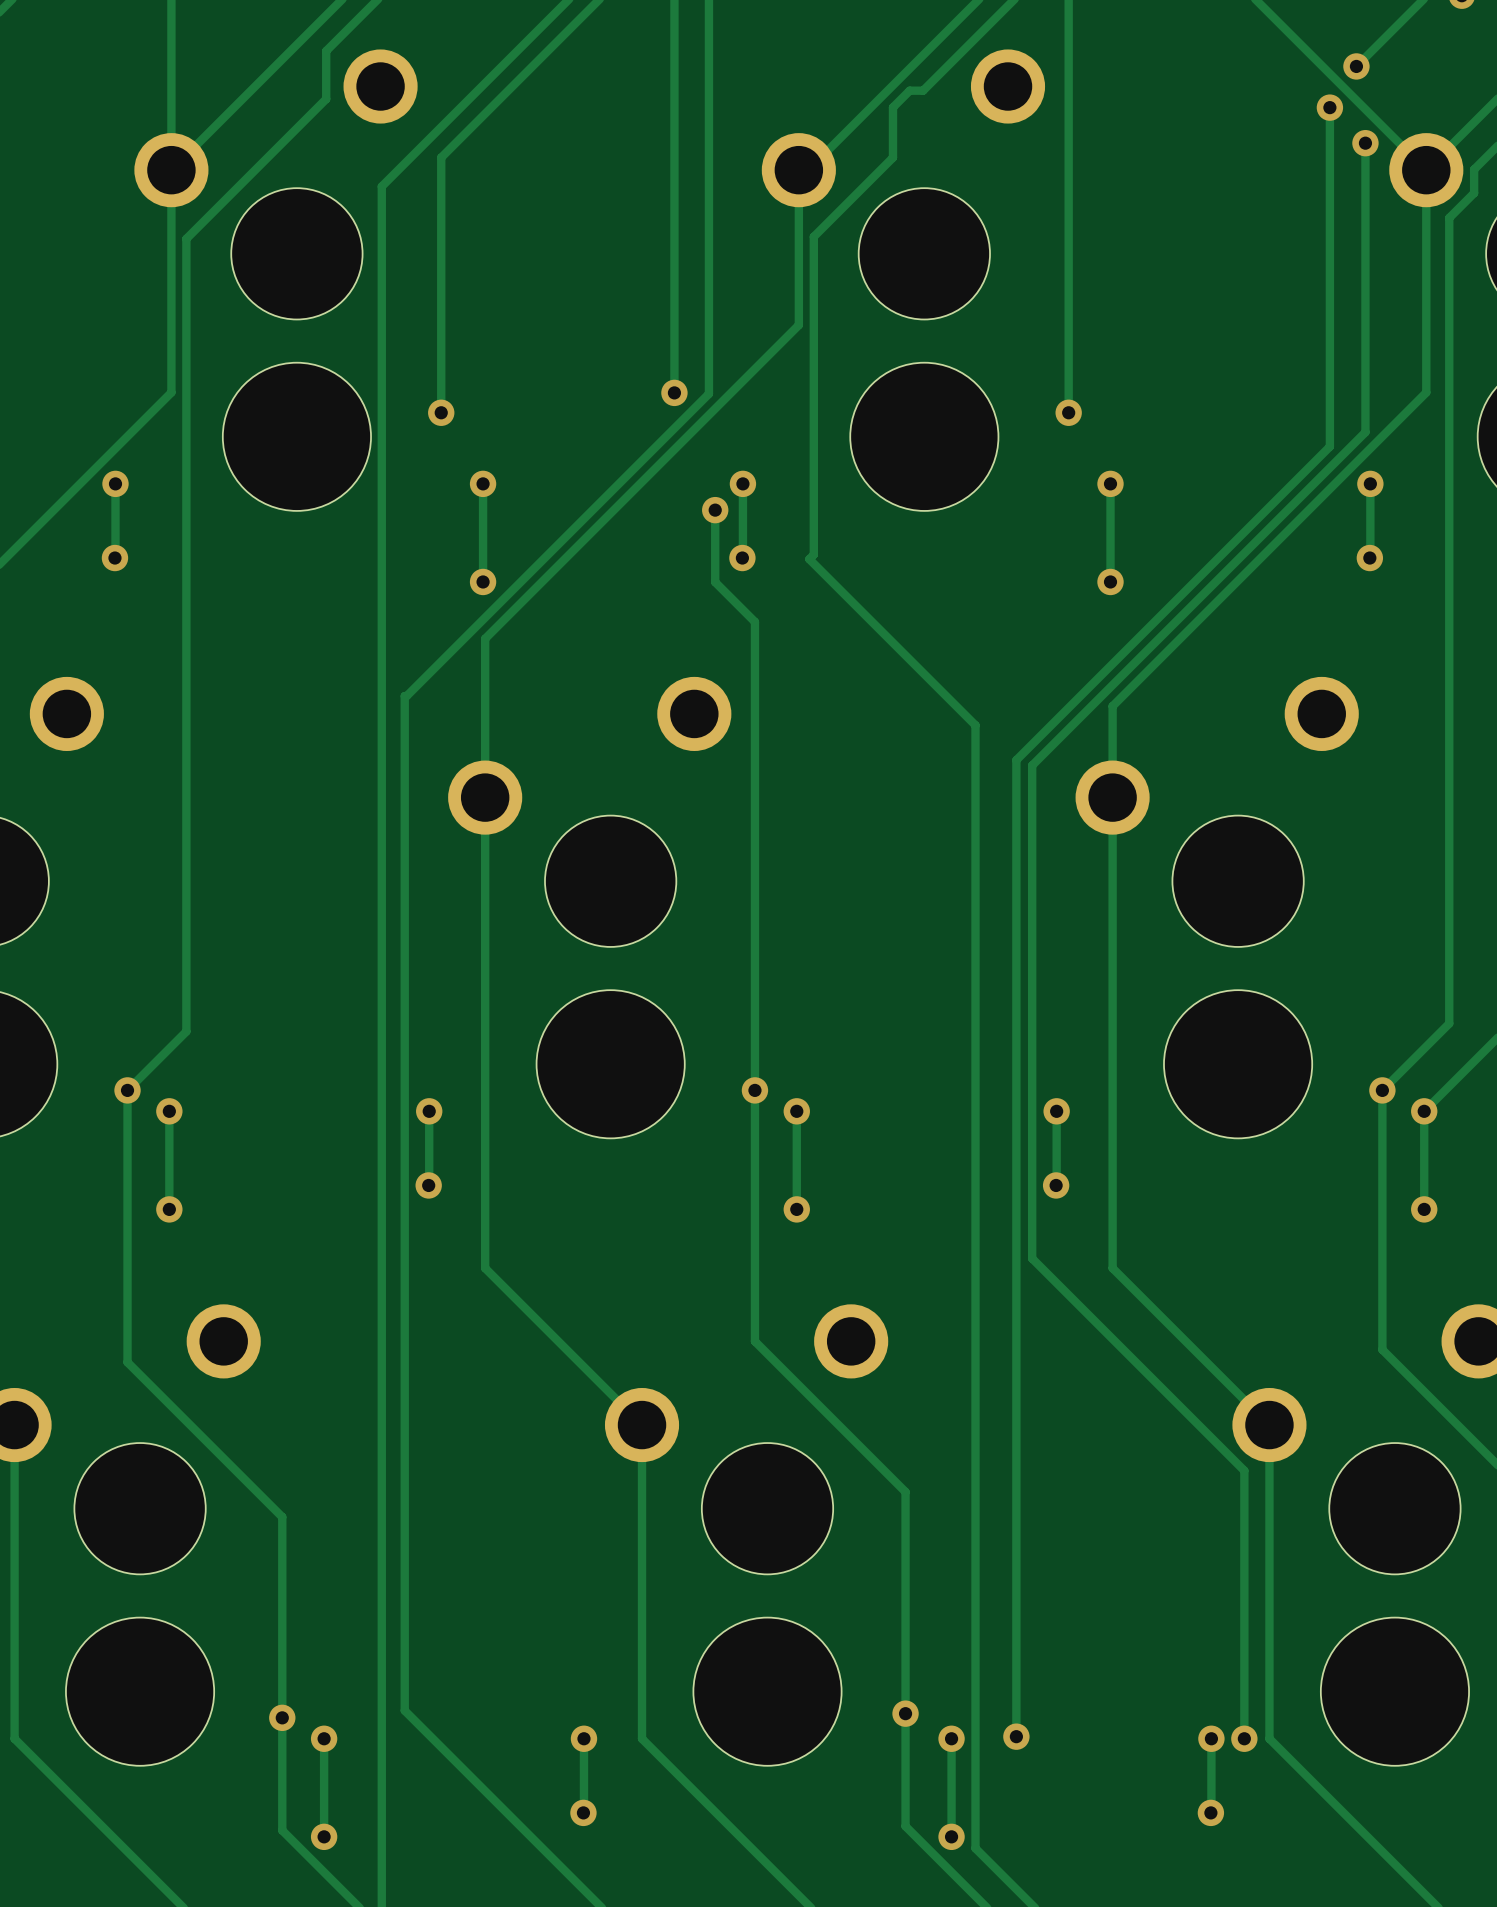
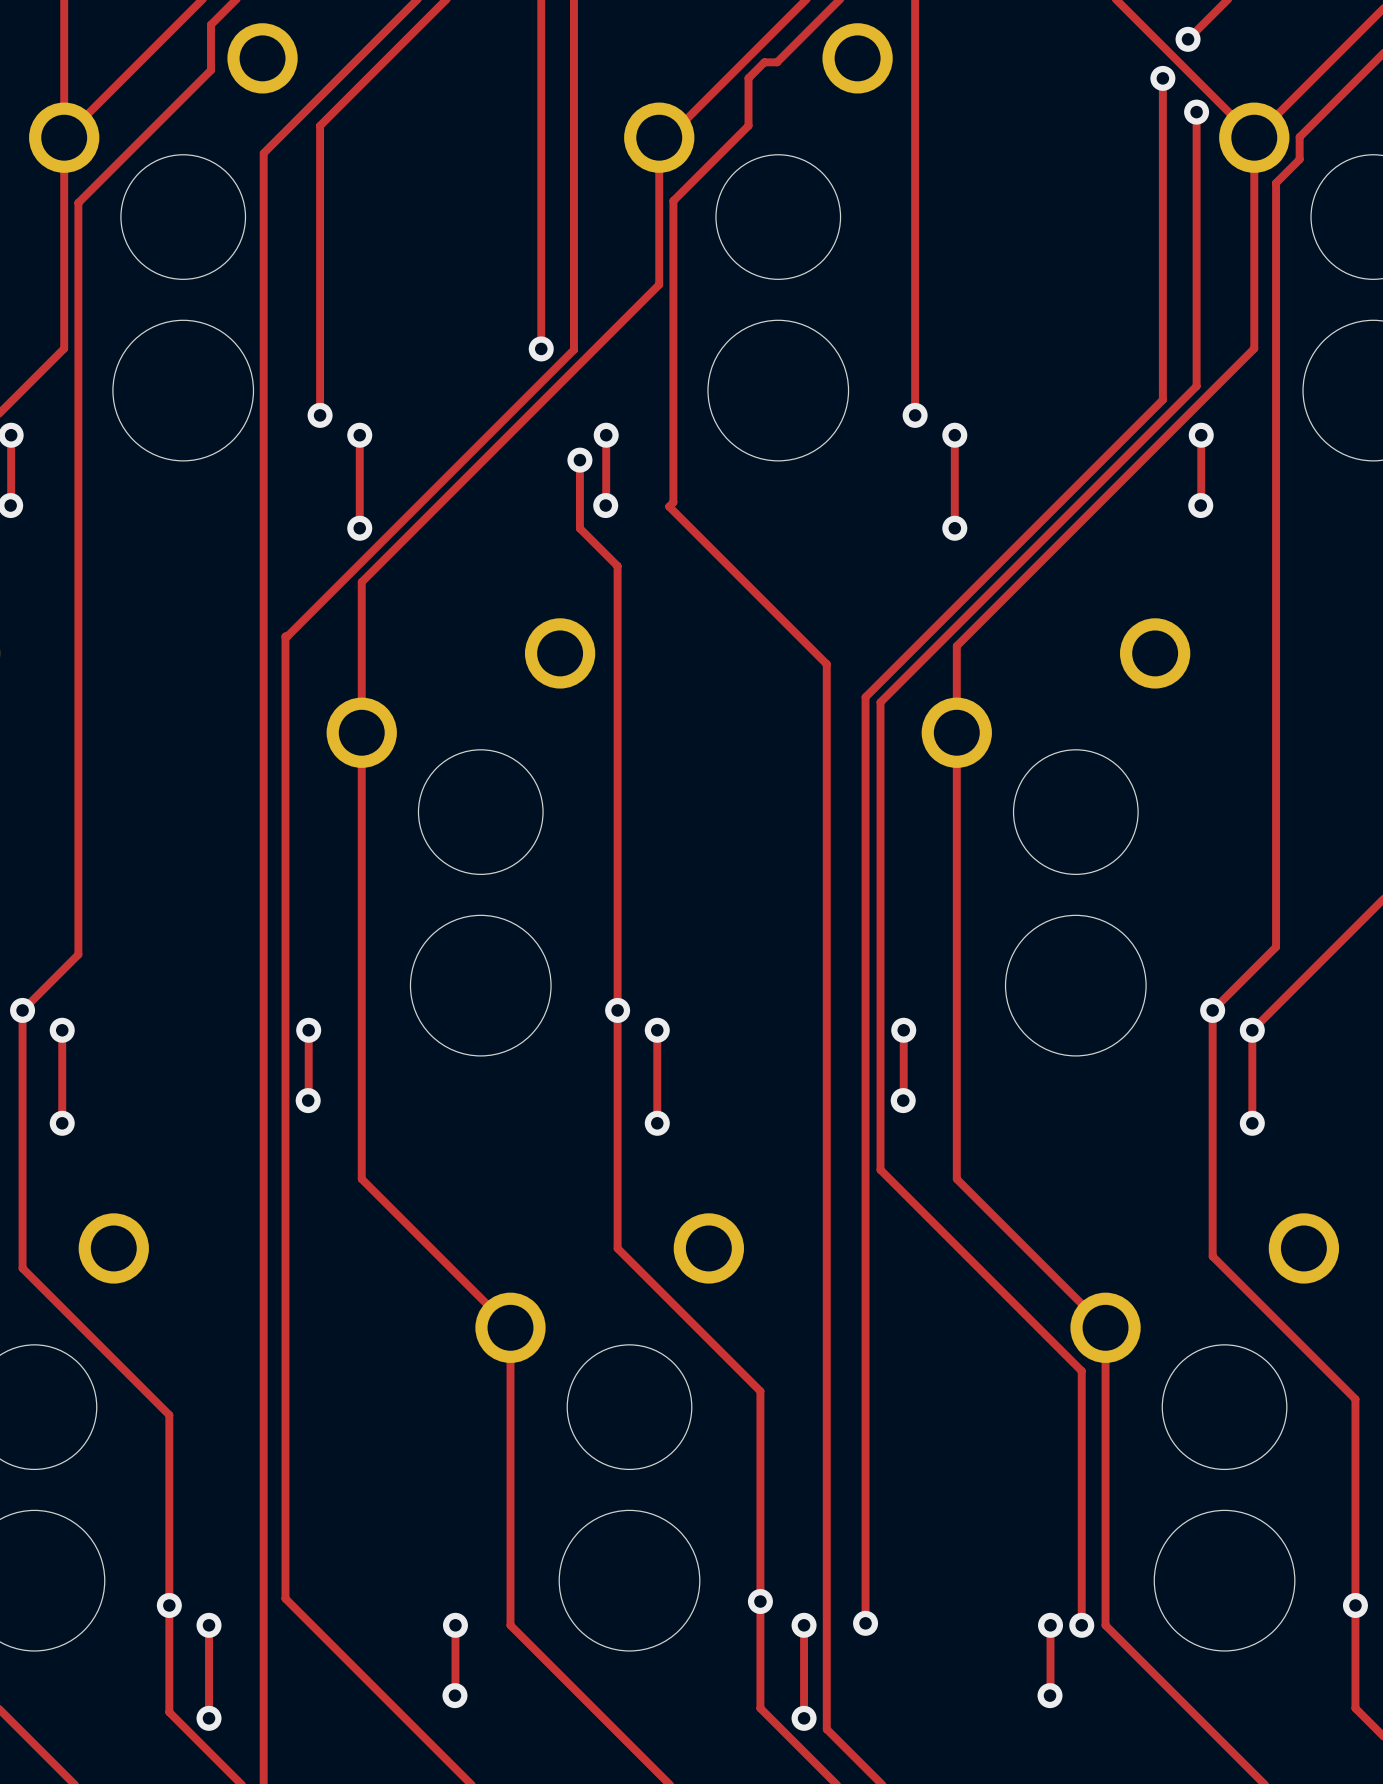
track: none -> (320, 367) (320, 415)
via position: (441, 412) -> (320, 415)
track: none -> (915, 367) (915, 415)
via position: (1068, 412) -> (915, 415)

